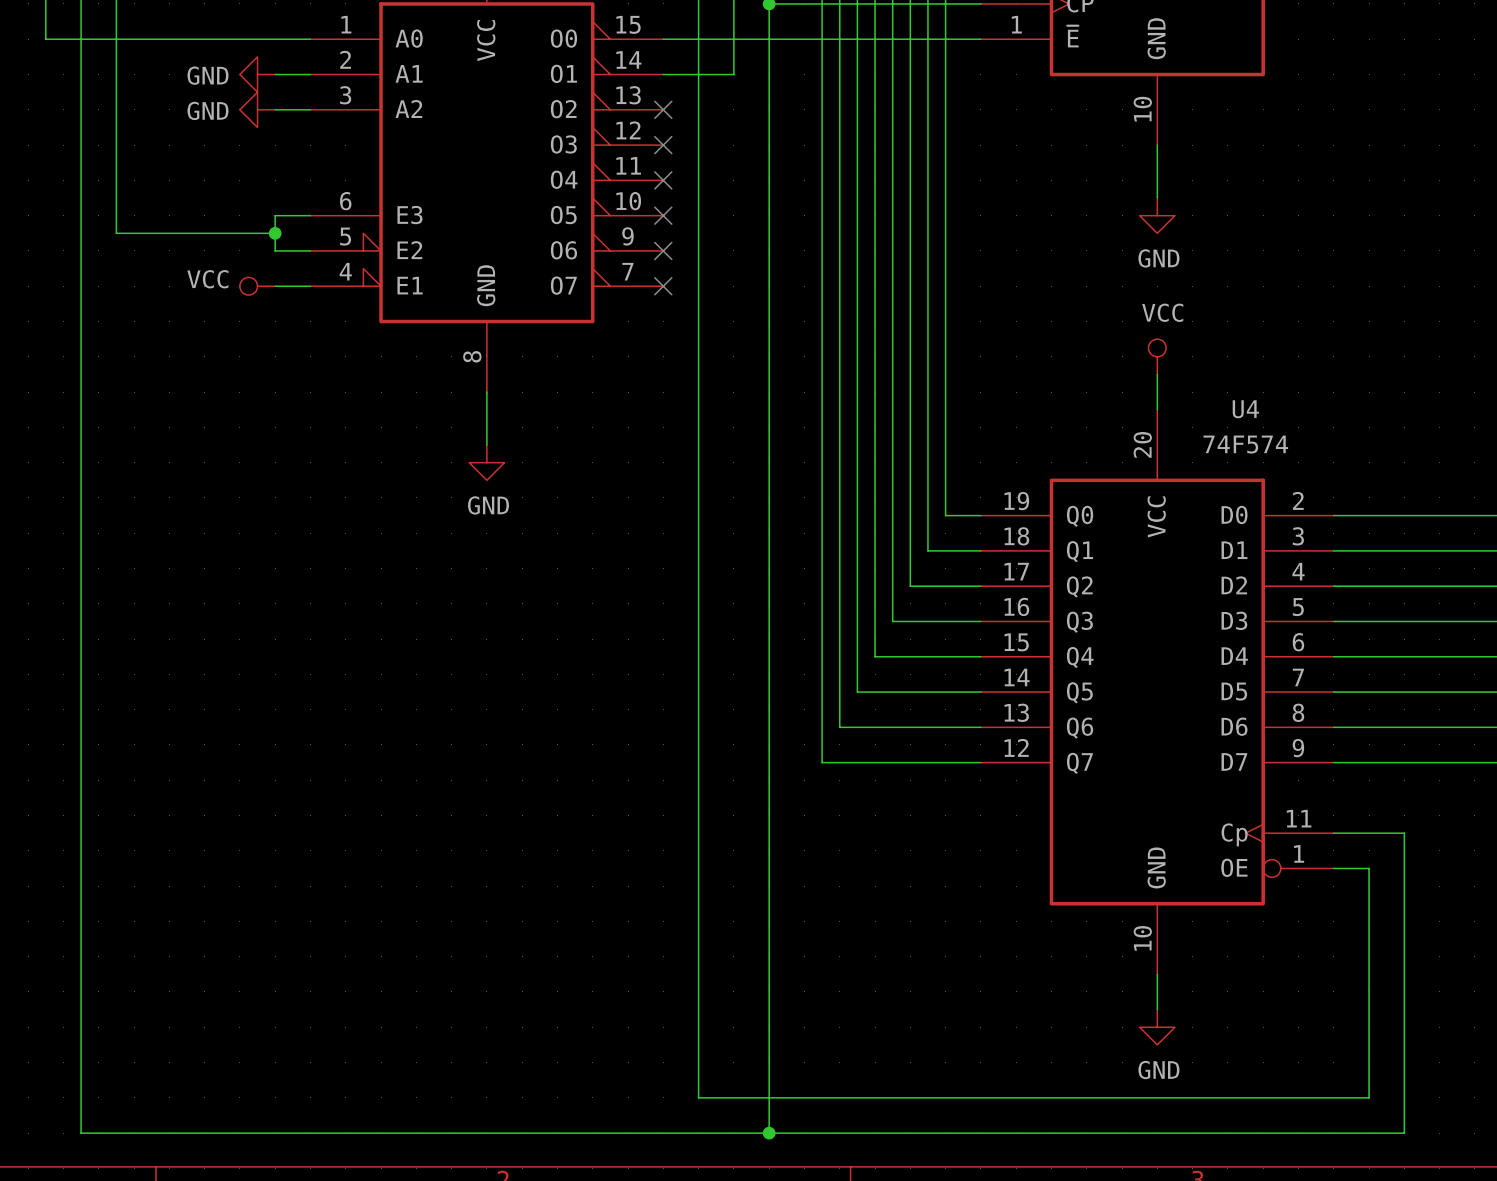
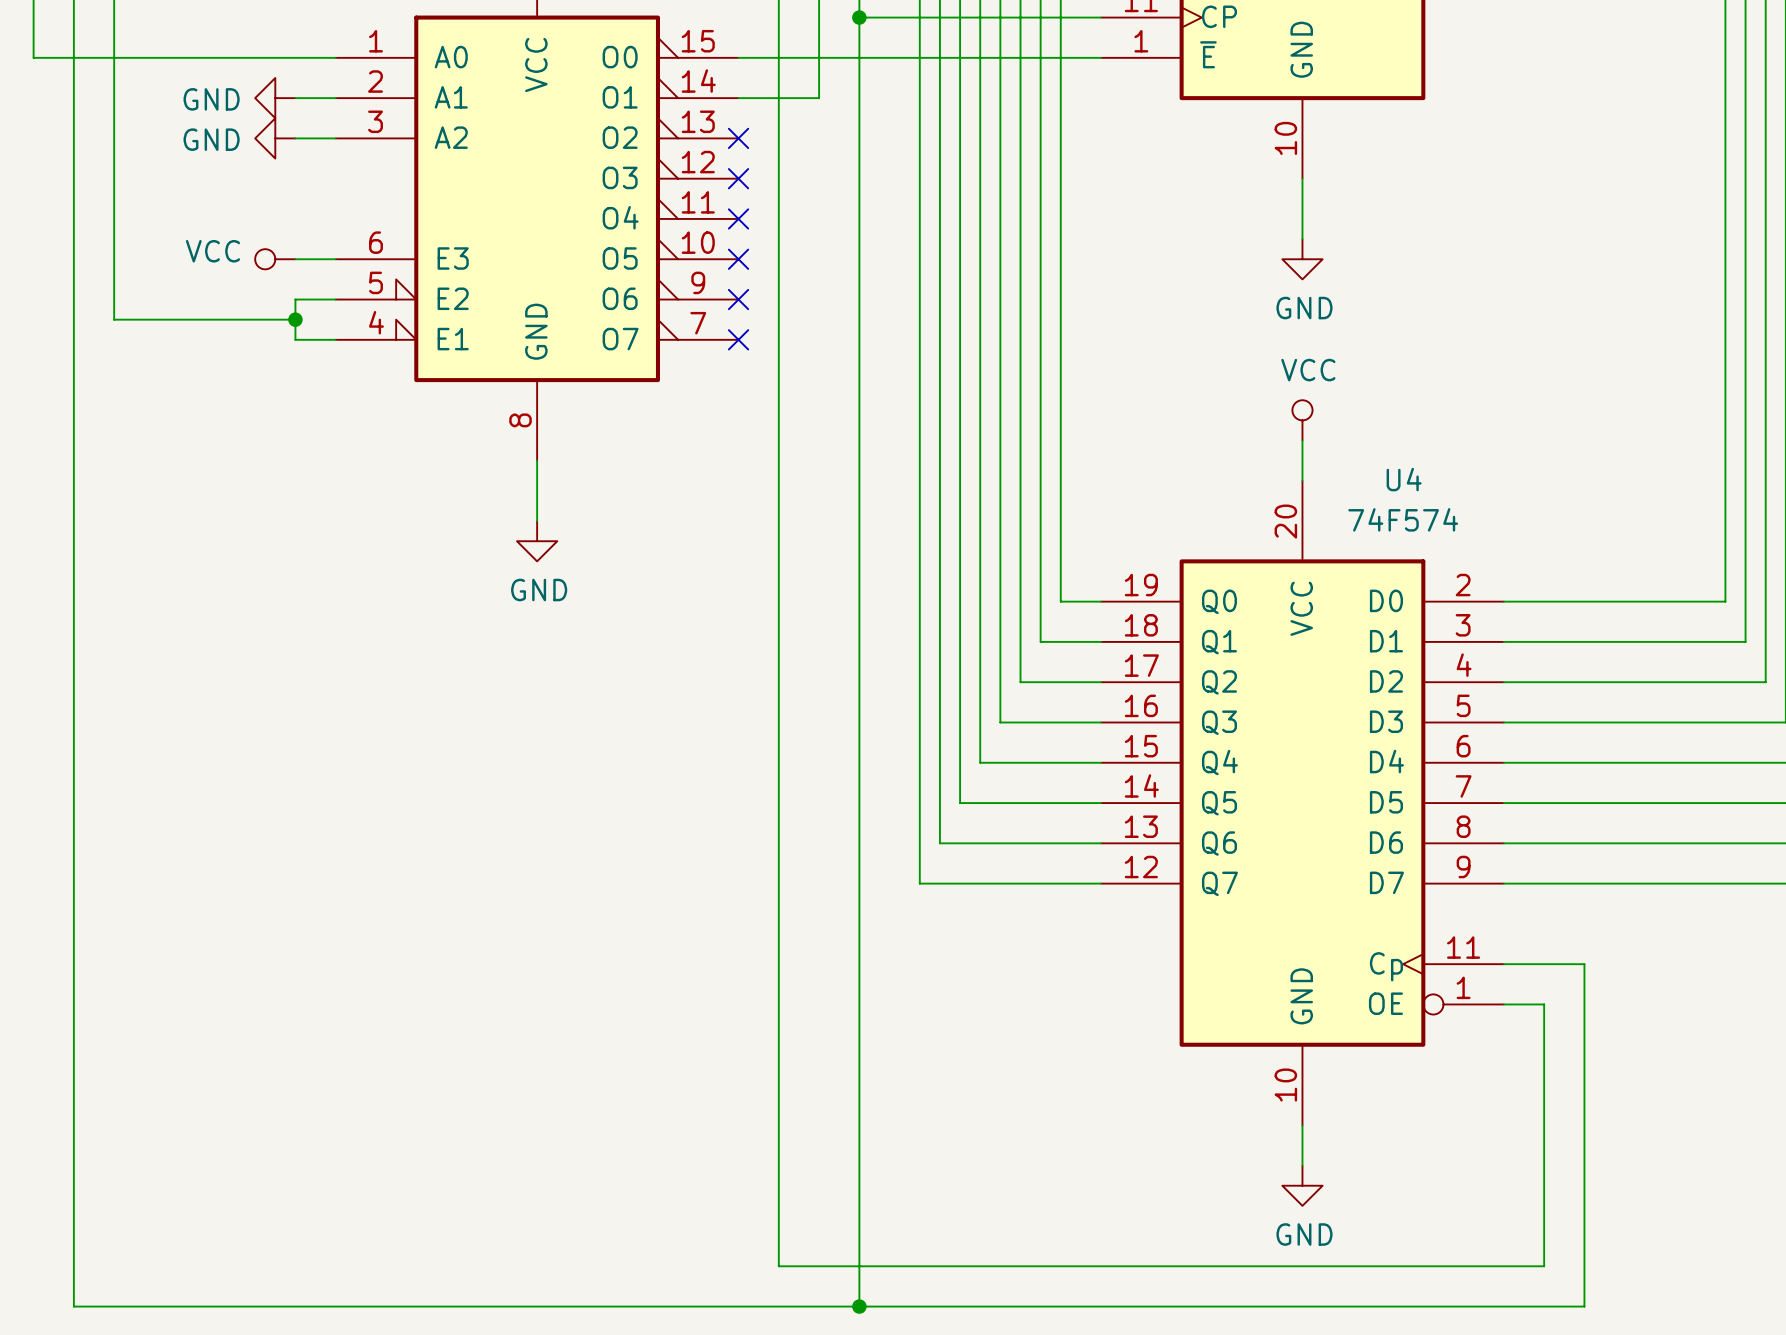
wire: (275, 215) (275, 250) -> (295, 339) (295, 299)
wire: (116, 233) (275, 233) -> (114, 279) (114, 319) (295, 319)
junction position: (275, 233) -> (295, 319)
power symbol position: VCC (257, 286) -> VCC (275, 259)

